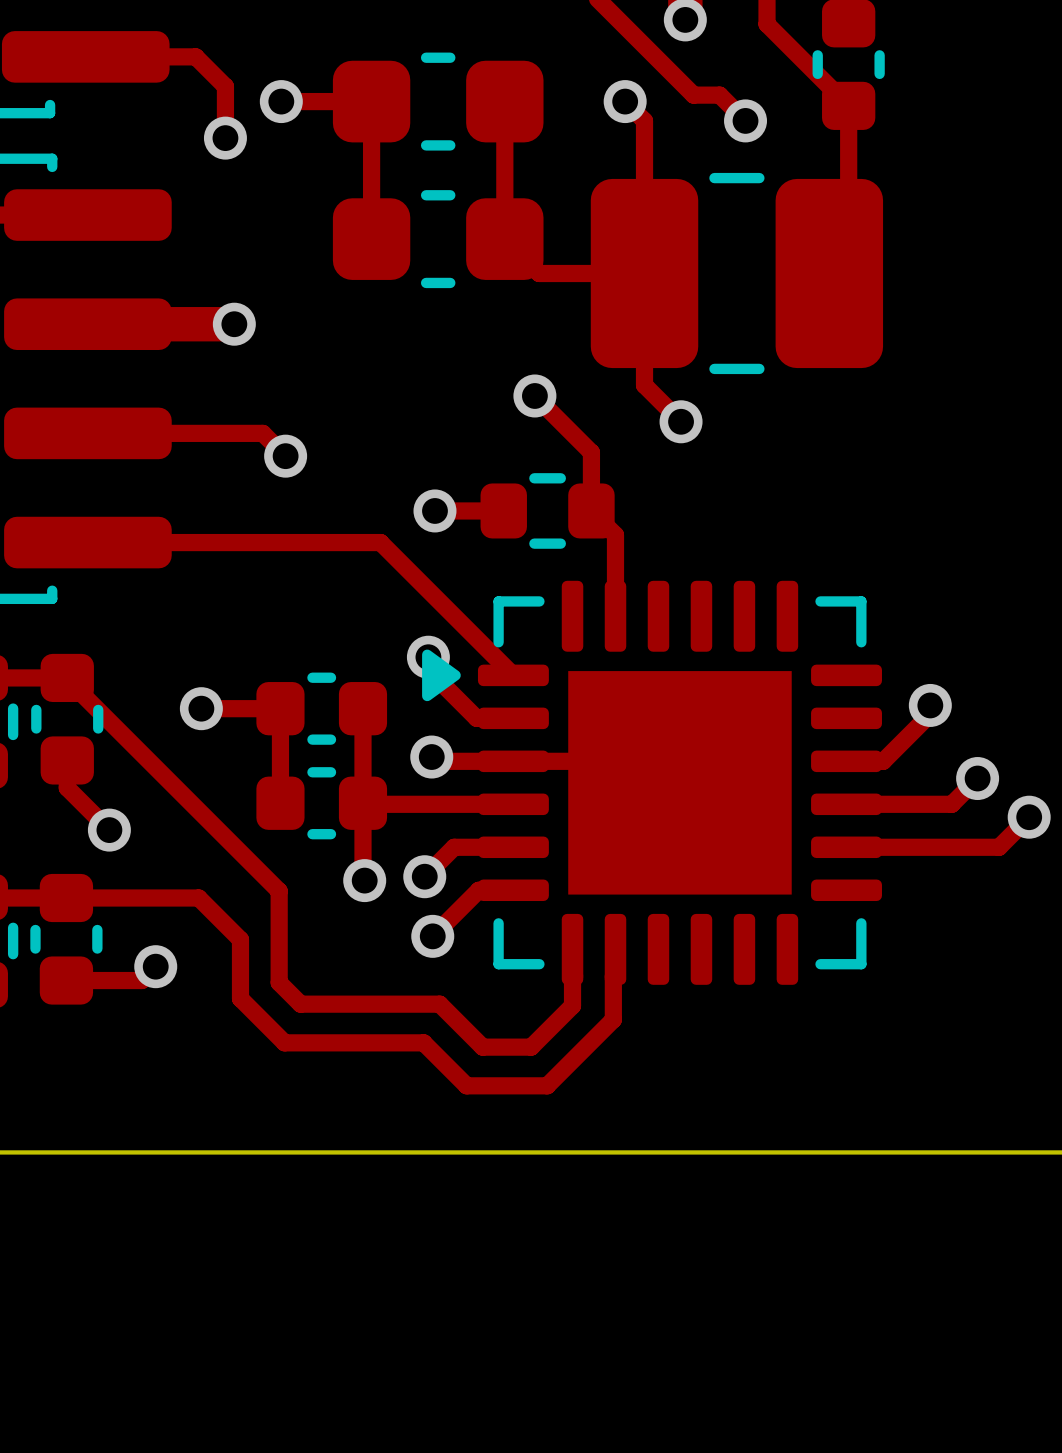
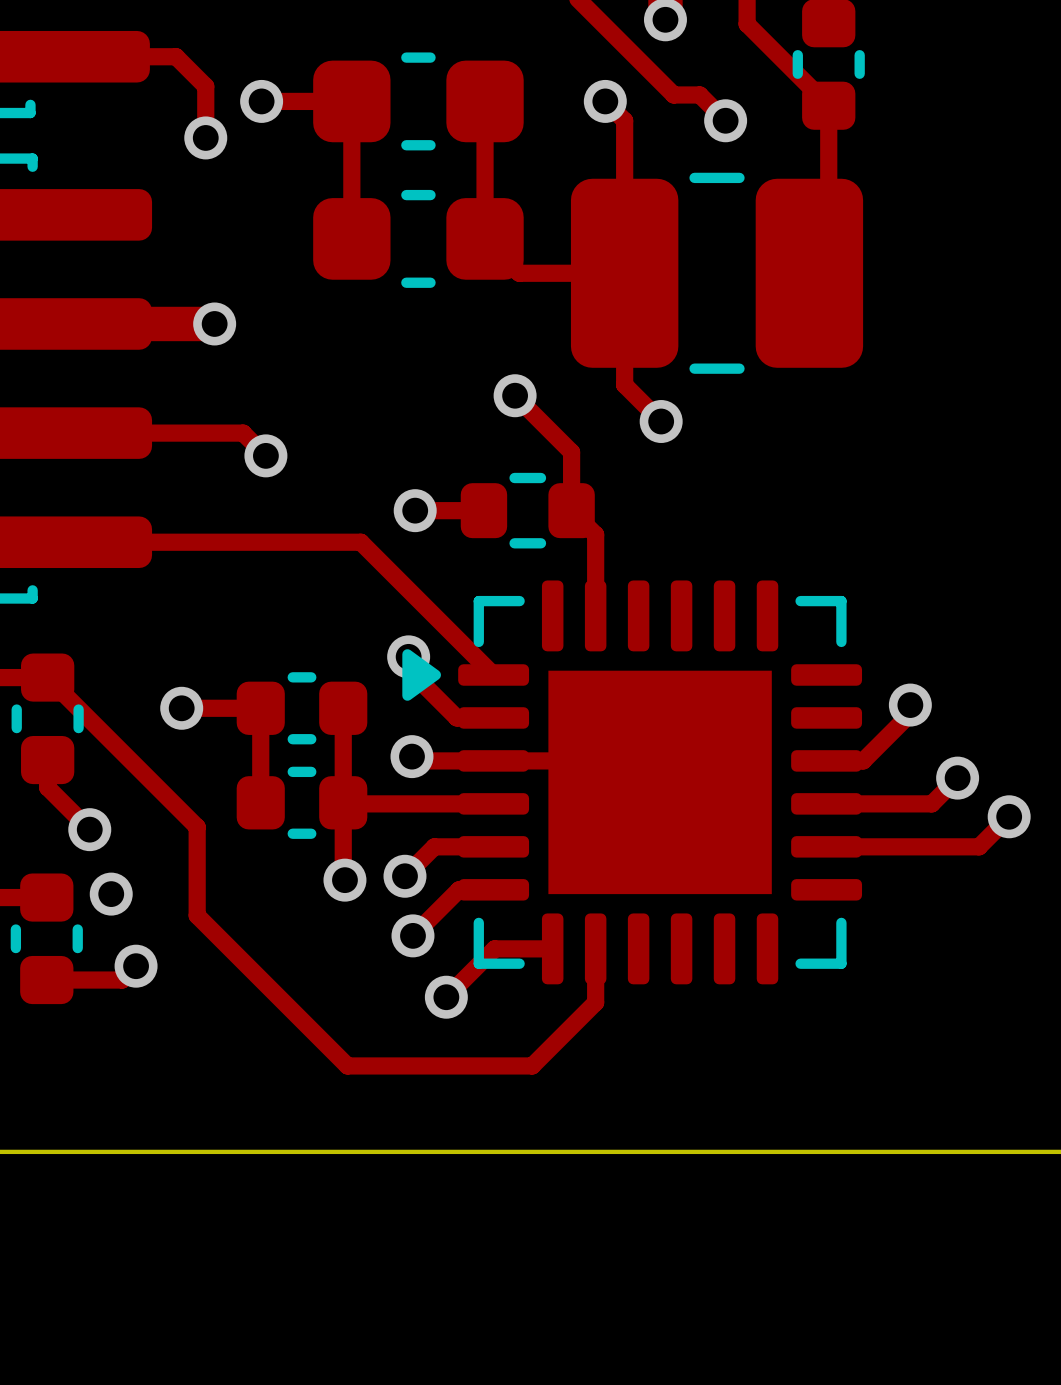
track: (67, 679) (279, 891) (279, 982) (300, 1004) (439, 1004) (482, 1047) (531, 1047) (572, 1005) (572, 949) -> (446, 997) (494, 948) (552, 948)
via: none -> (111, 894)
track: (66, 898) (198, 898) (216, 916) -> (47, 677) (197, 827) (197, 915)
track: (240, 939) (240, 998) (284, 1042) (423, 1042) (466, 1085) (547, 1085) (613, 1019) (613, 976) (615, 974) -> (220, 939) (347, 1065) (532, 1065) (595, 1002) (595, 973)
via: none -> (446, 997)

